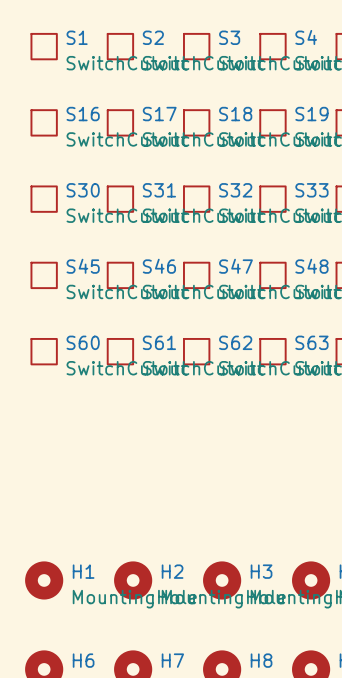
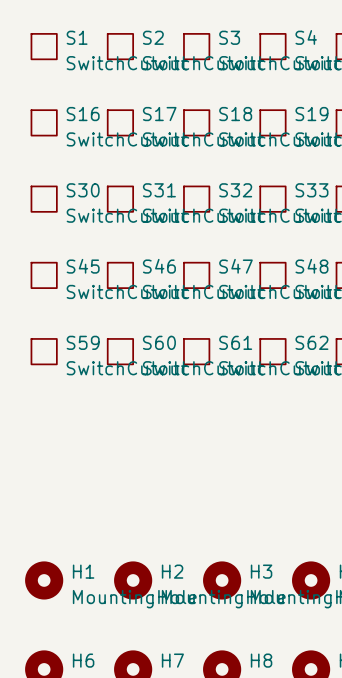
S60 name: S60 (83, 342) -> S59 (83, 342)
S61 name: S61 (159, 342) -> S60 (159, 342)
S62 name: S62 (235, 342) -> S61 (235, 342)
S63 name: S63 (311, 342) -> S62 (311, 342)

